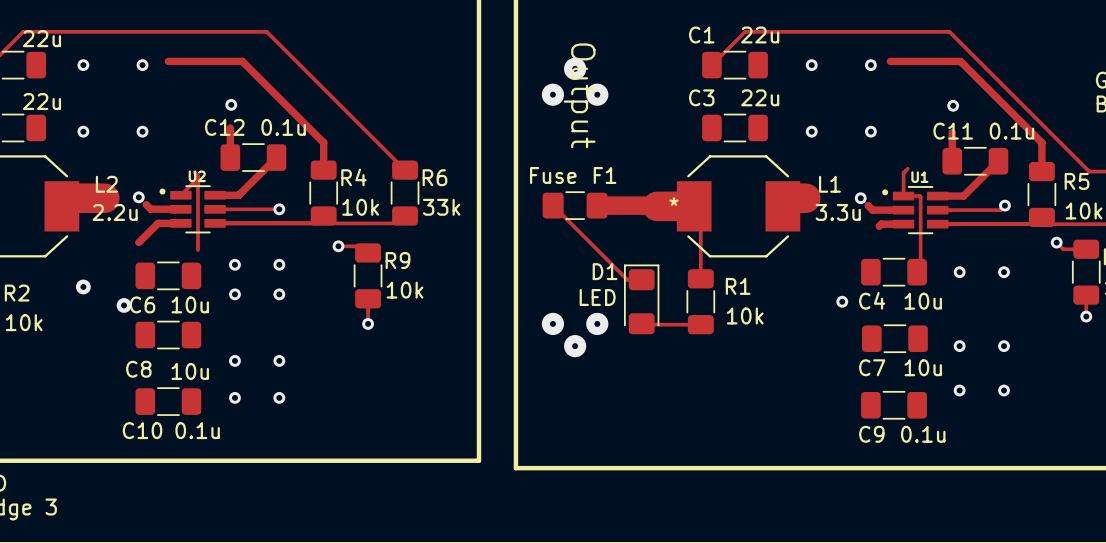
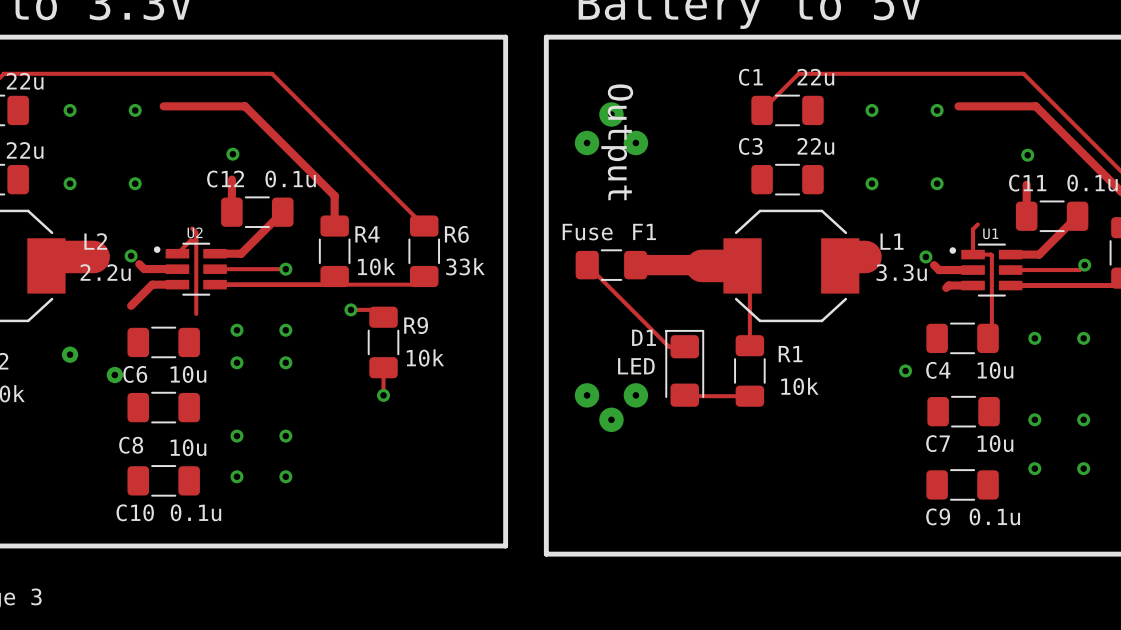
L1 text: * (673, 201) -> none

